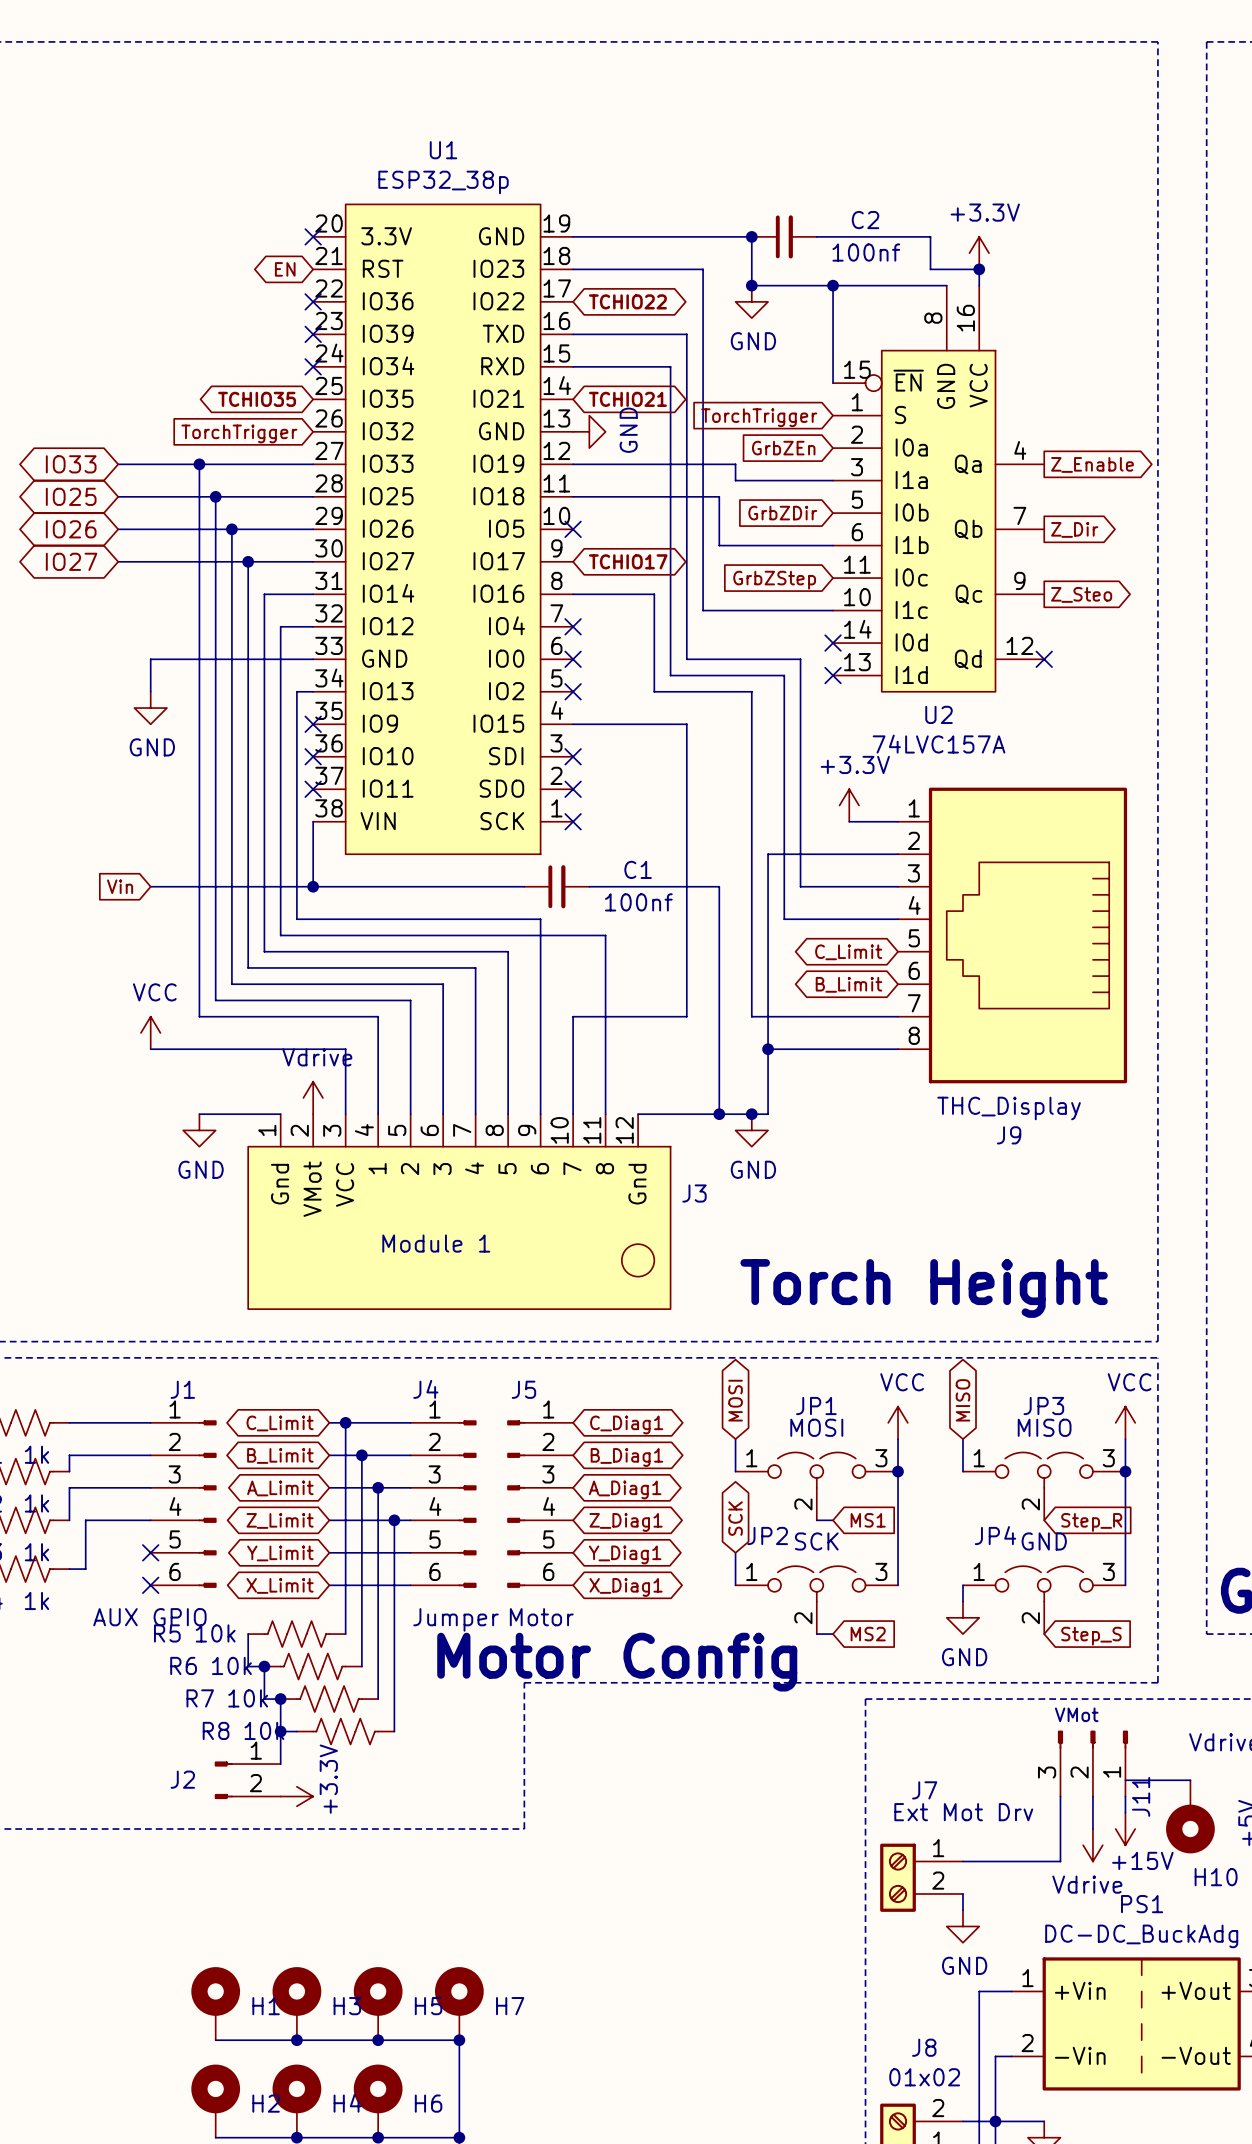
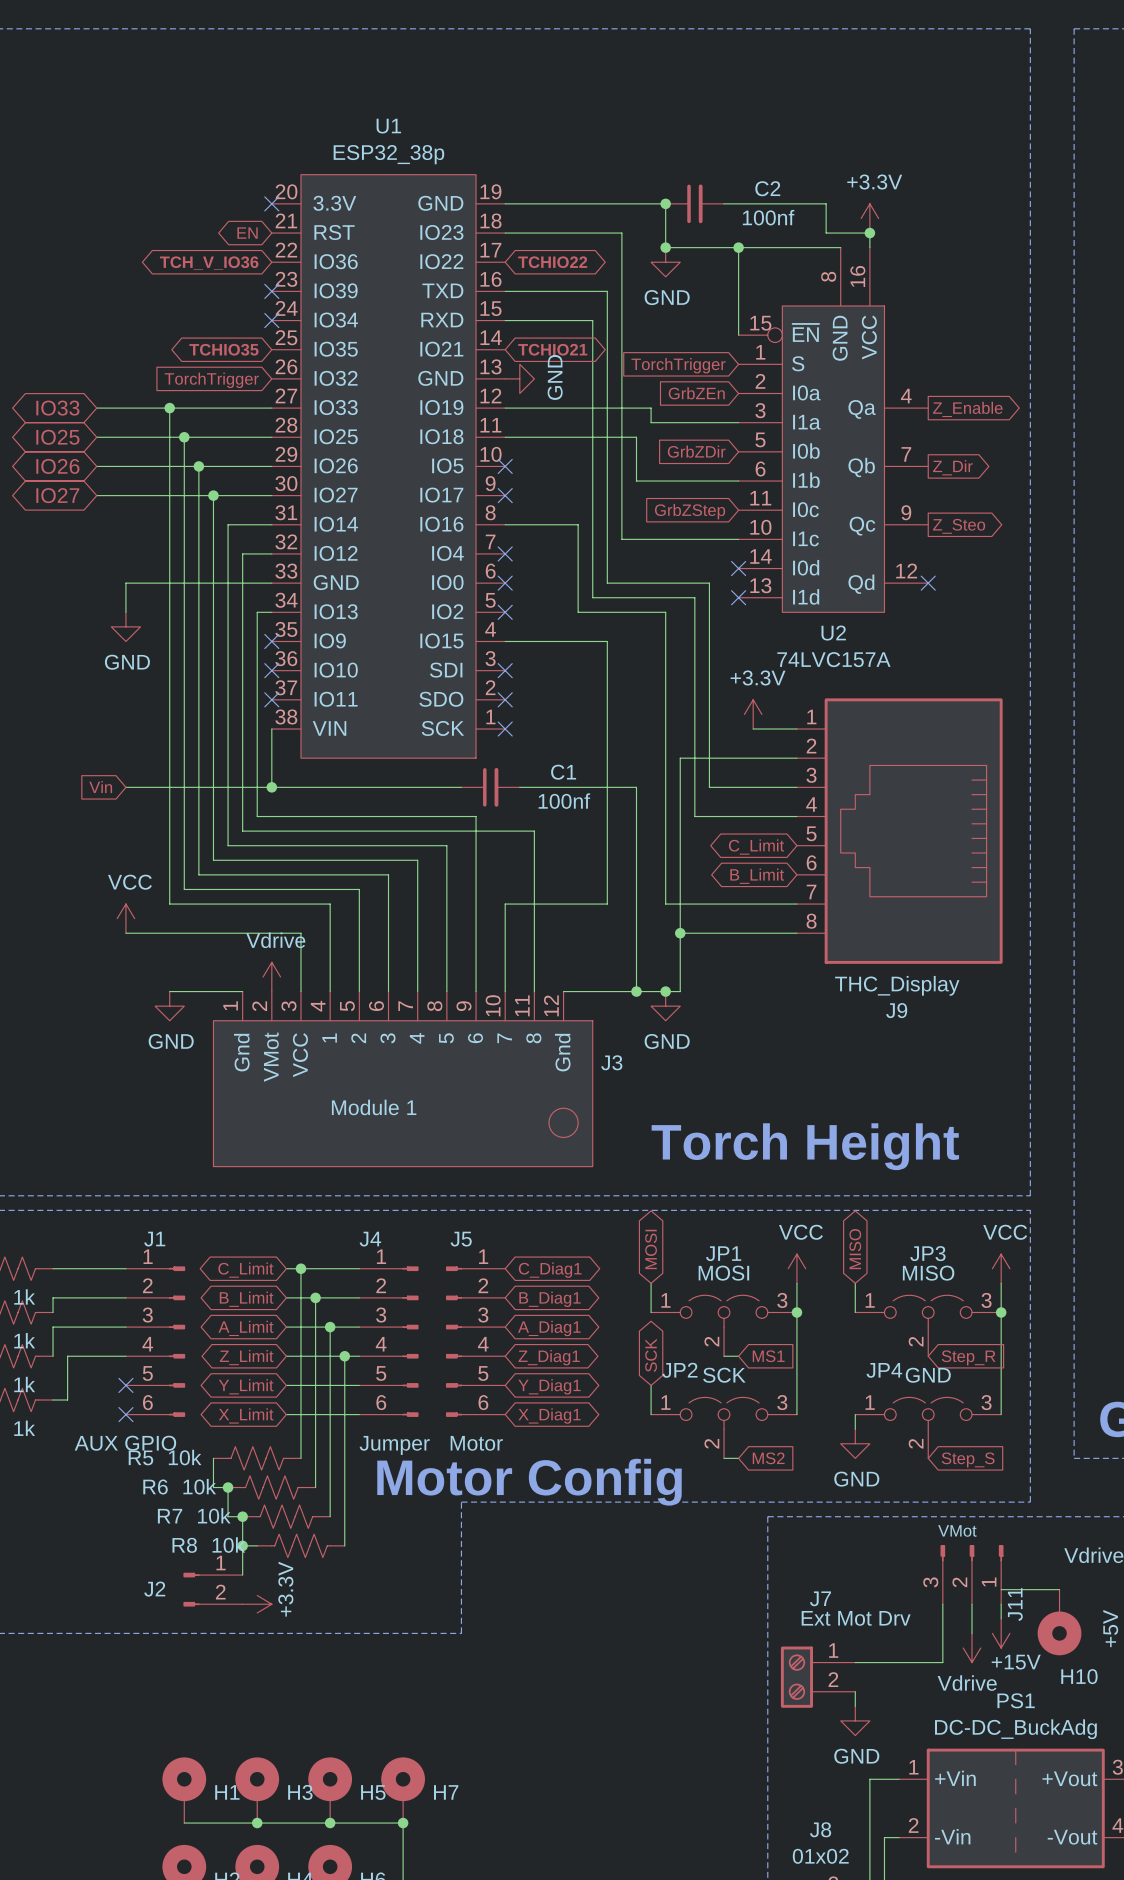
no-connect mark: (313, 301) -> none
global label: none -> TCH_V_IO36 (209, 263)
no-connect mark: none -> (505, 495)
global label: TCHIO17 (628, 561) -> none

